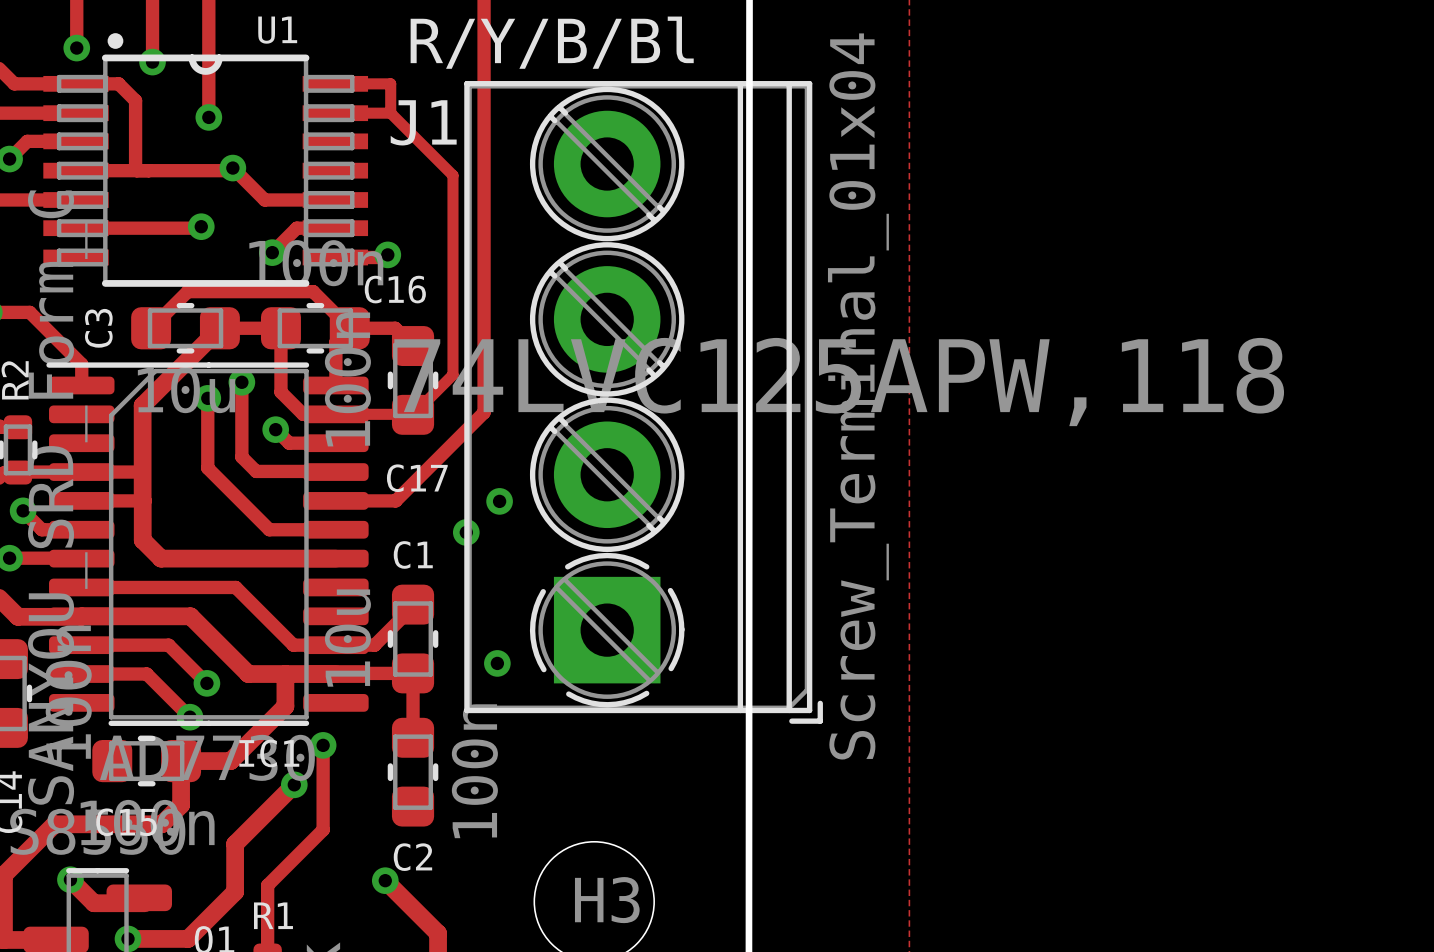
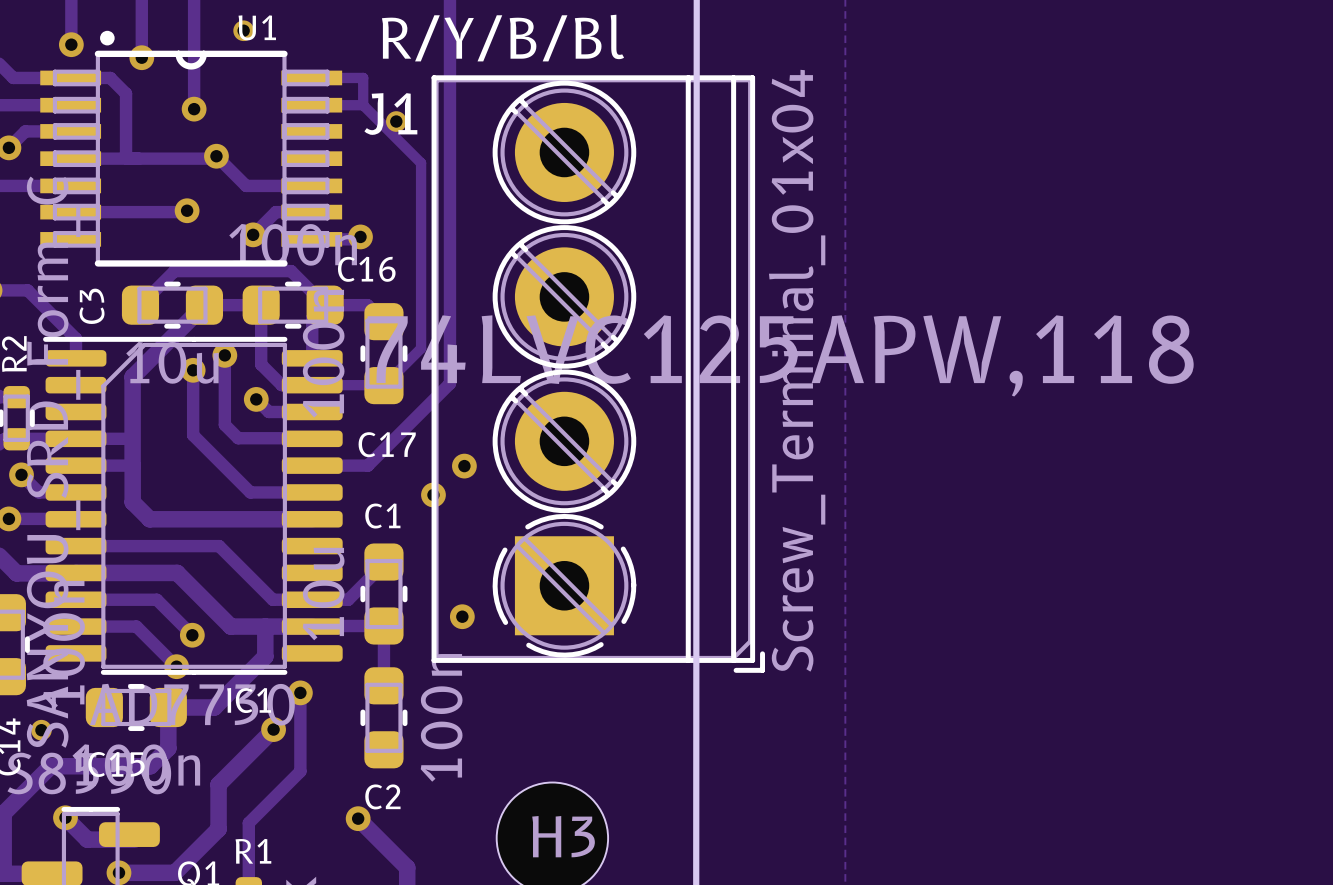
via: none -> (243, 30)
via: none -> (396, 121)
via: none -> (41, 730)

